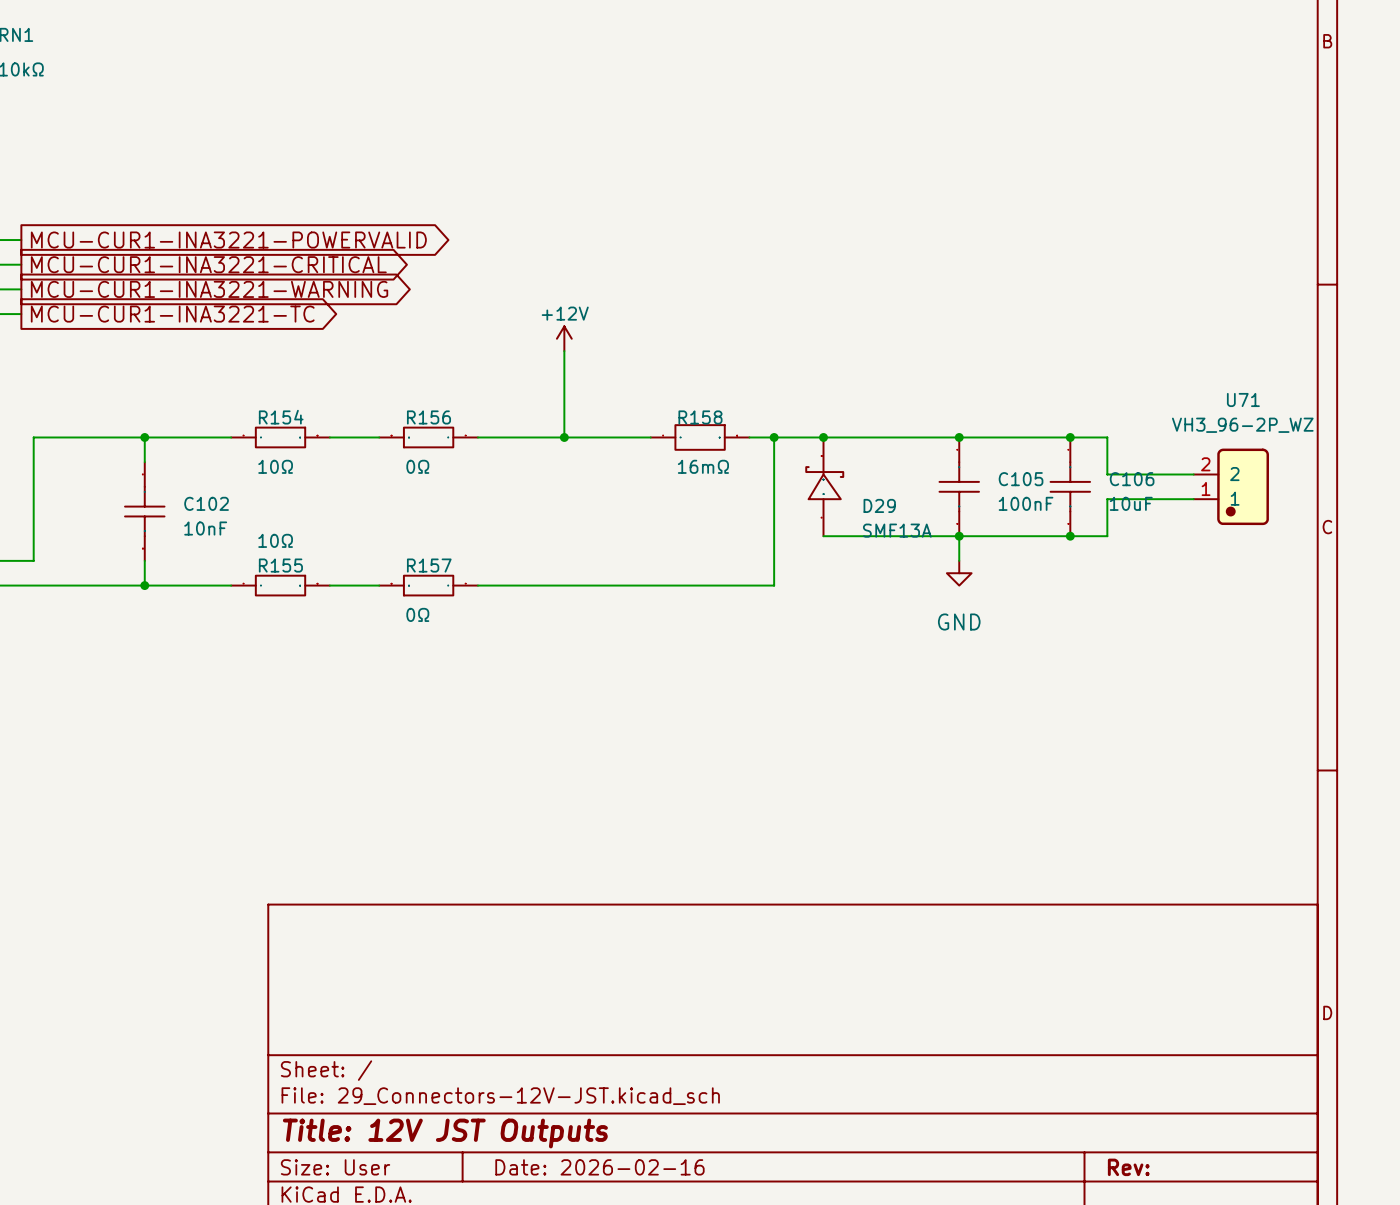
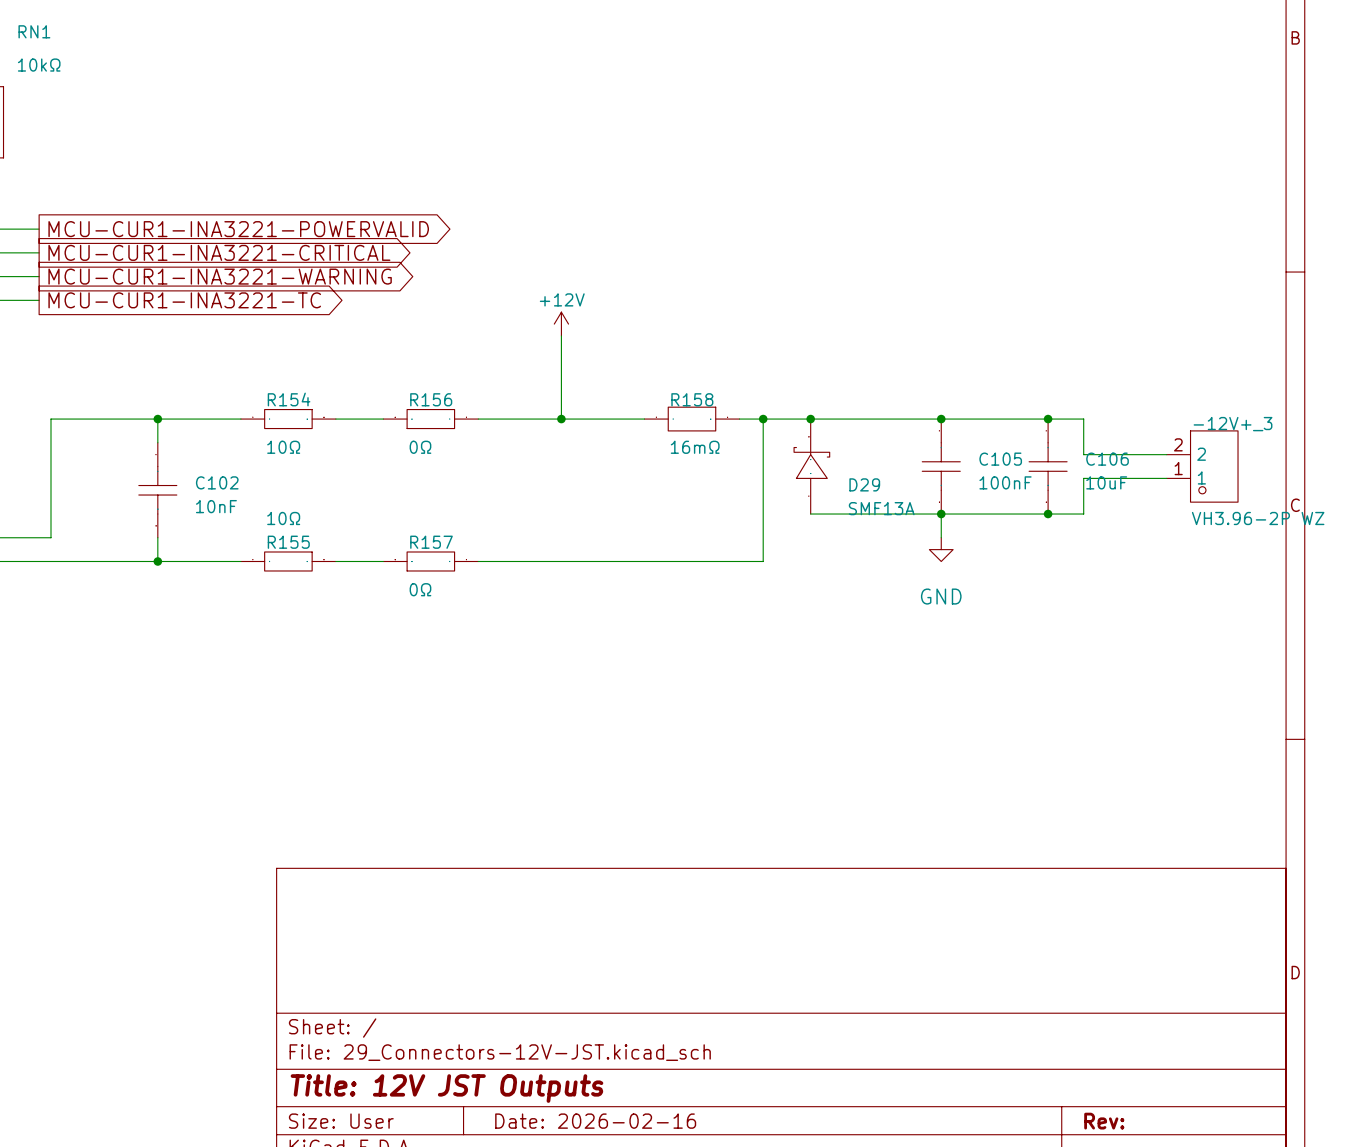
-12V+_3: none -> VH3.96-2P WZ (1202, 466)
U71: VH3_96-2P_WZ (1231, 486) -> none

